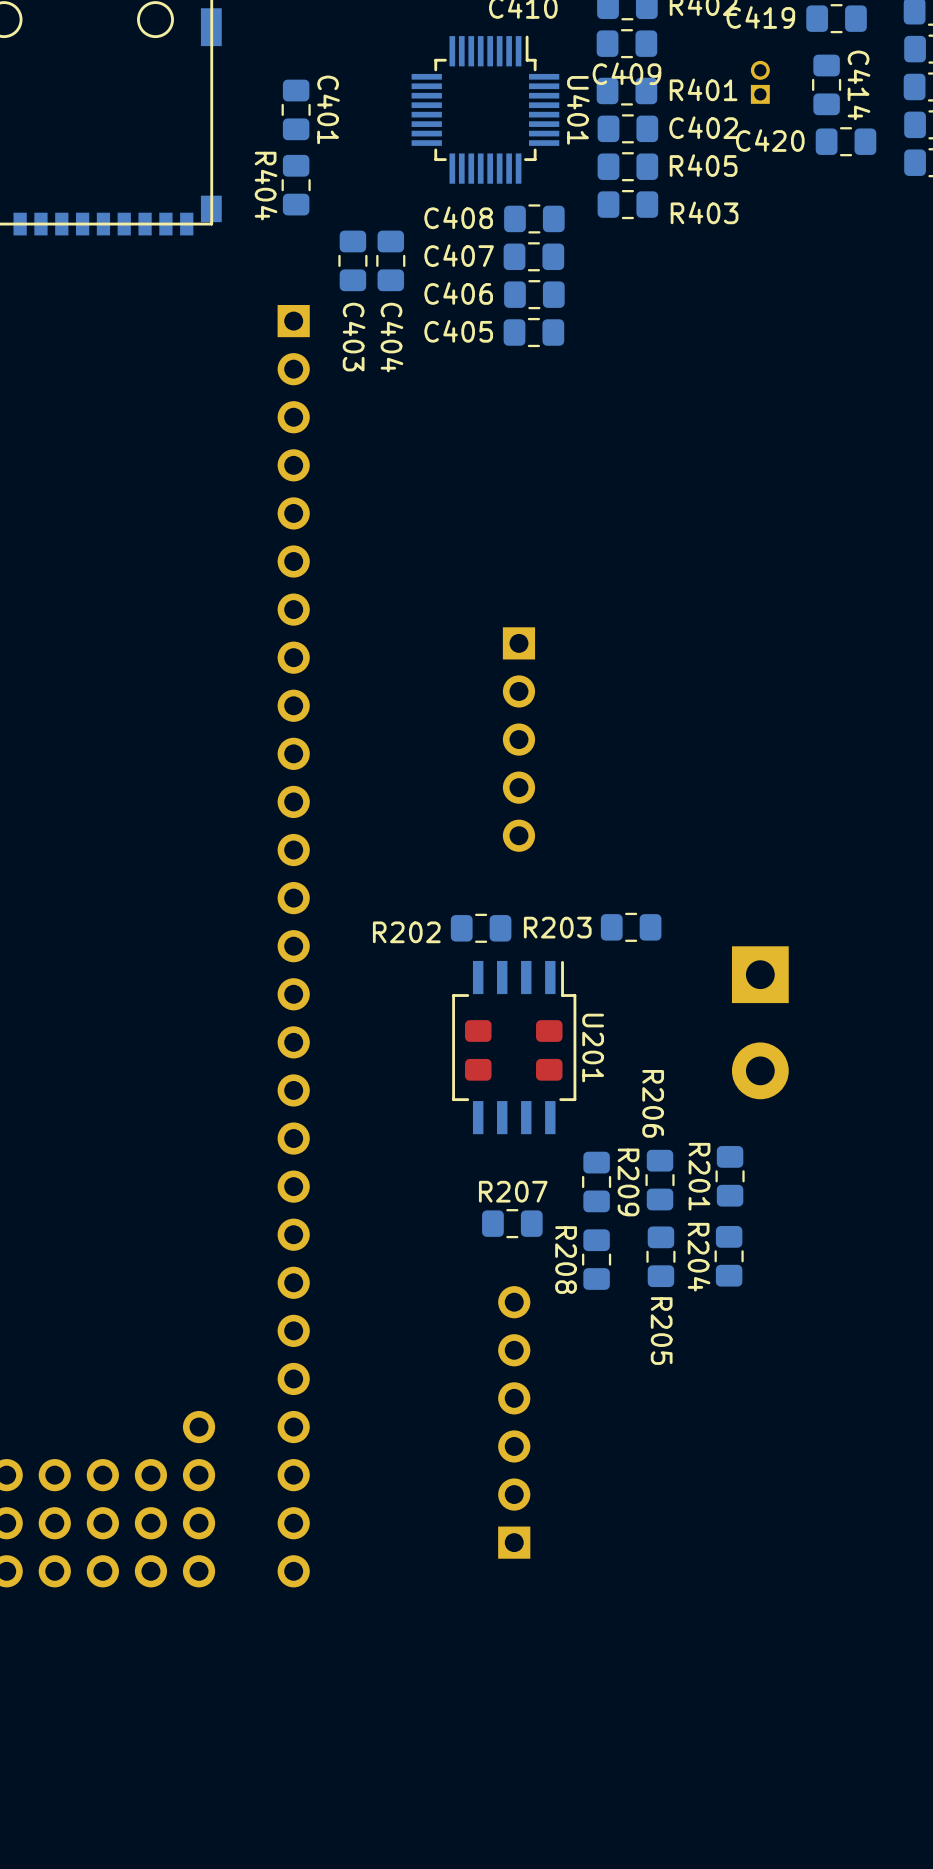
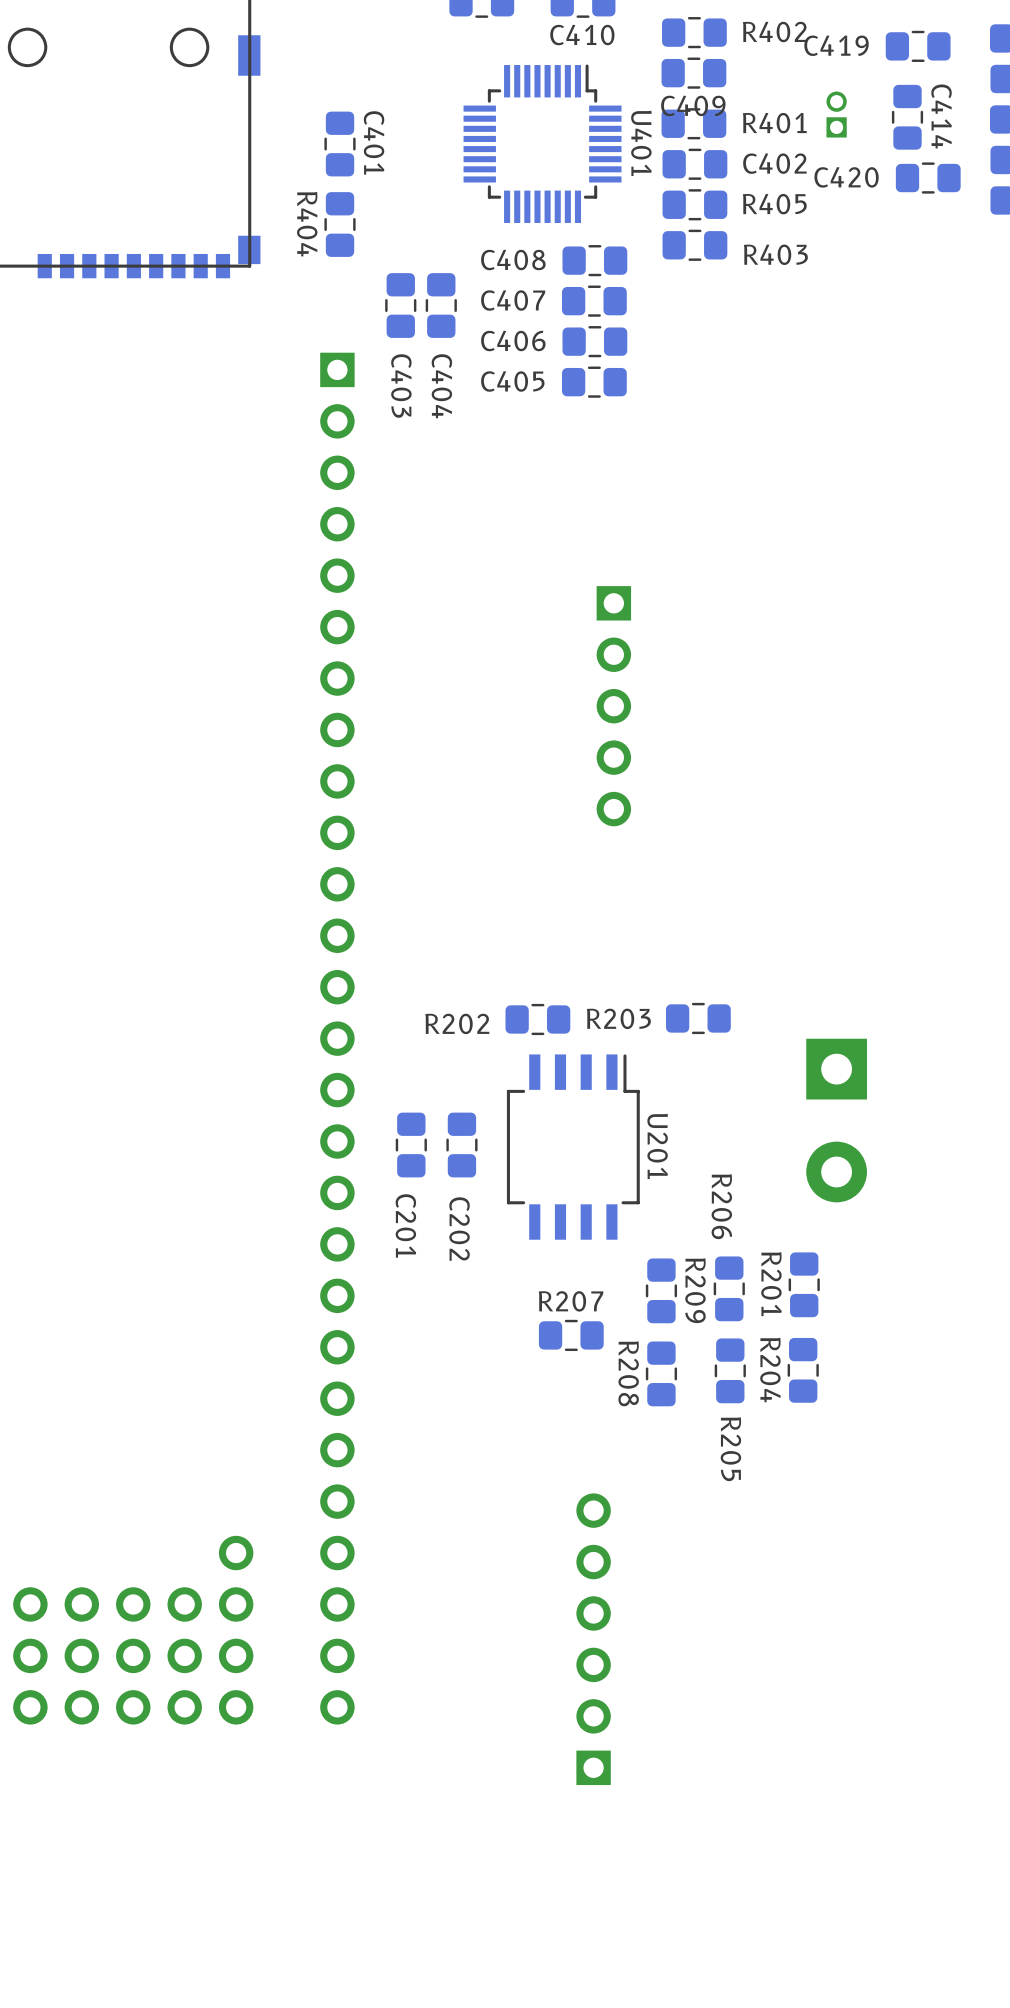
part position: (518, 739) -> (613, 706)
C202 side: top (478, 1050) -> bottom (461, 1145)
C201 side: top (549, 1050) -> bottom (411, 1145)
part position: (514, 1422) -> (593, 1639)

